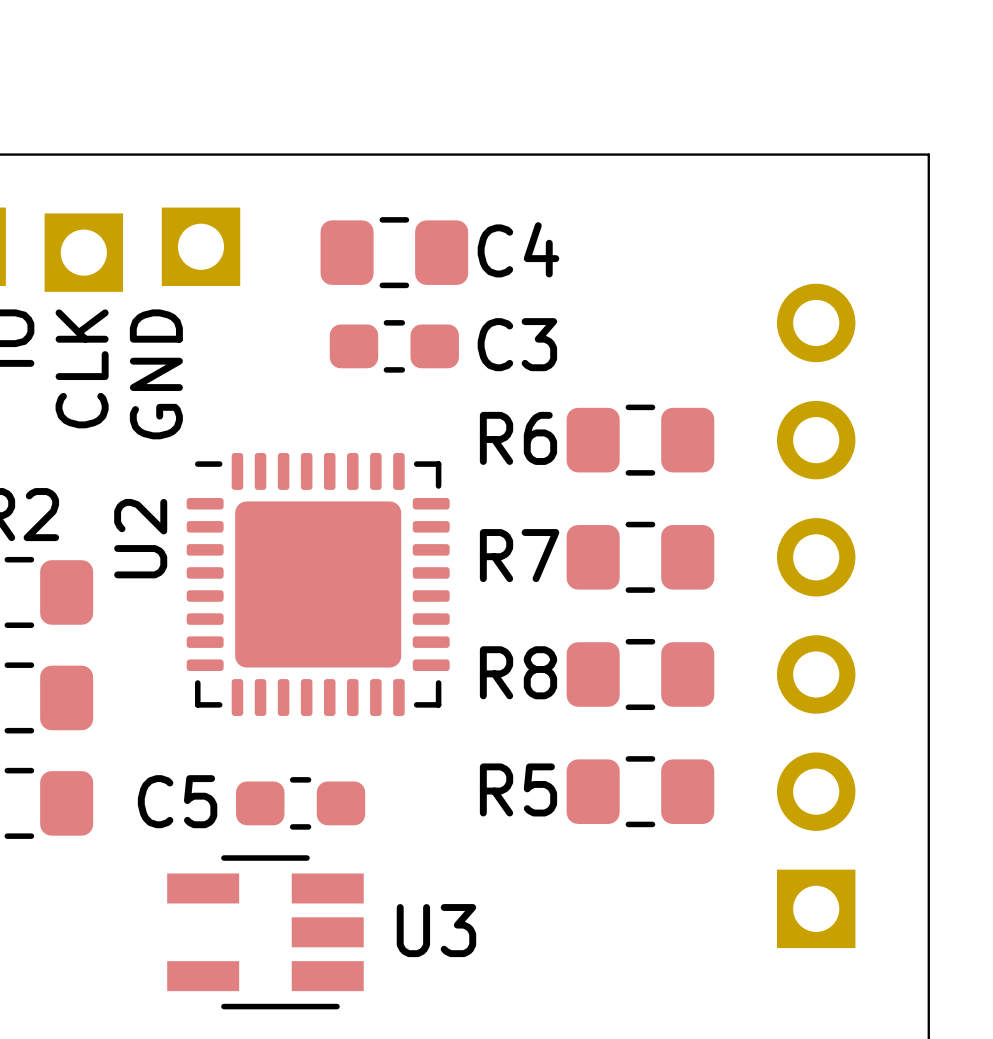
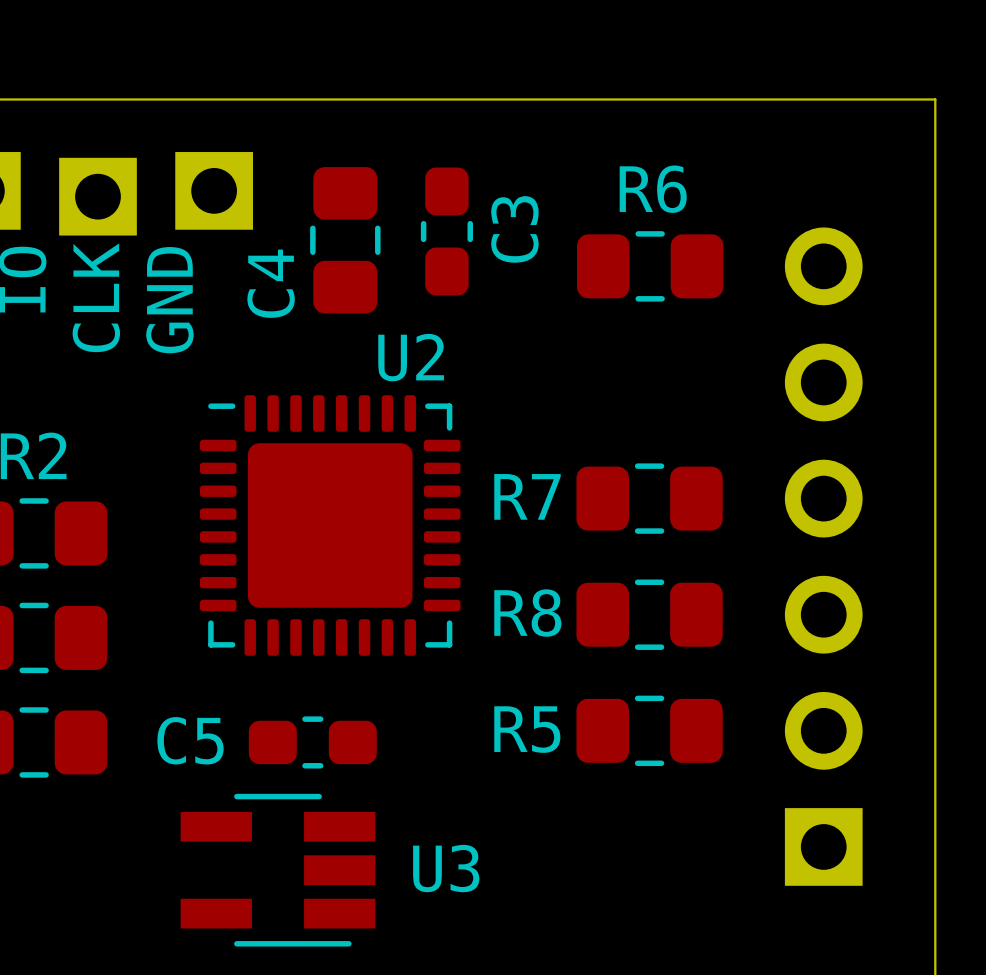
C4 name position: C4 (518, 249) -> C4 (271, 283)
C4 rotation: 0° (394, 252) -> 90° clockwise (345, 240)
C3 rotation: 0° (394, 346) -> 90° clockwise (446, 231)
R6 name position: R6 (518, 438) -> R6 (653, 189)
R6 position: (640, 440) -> (650, 266)
U2 name rotation: 0° (140, 538) -> 90° clockwise (411, 357)
U2 name position: U2 (140, 538) -> U2 (411, 357)

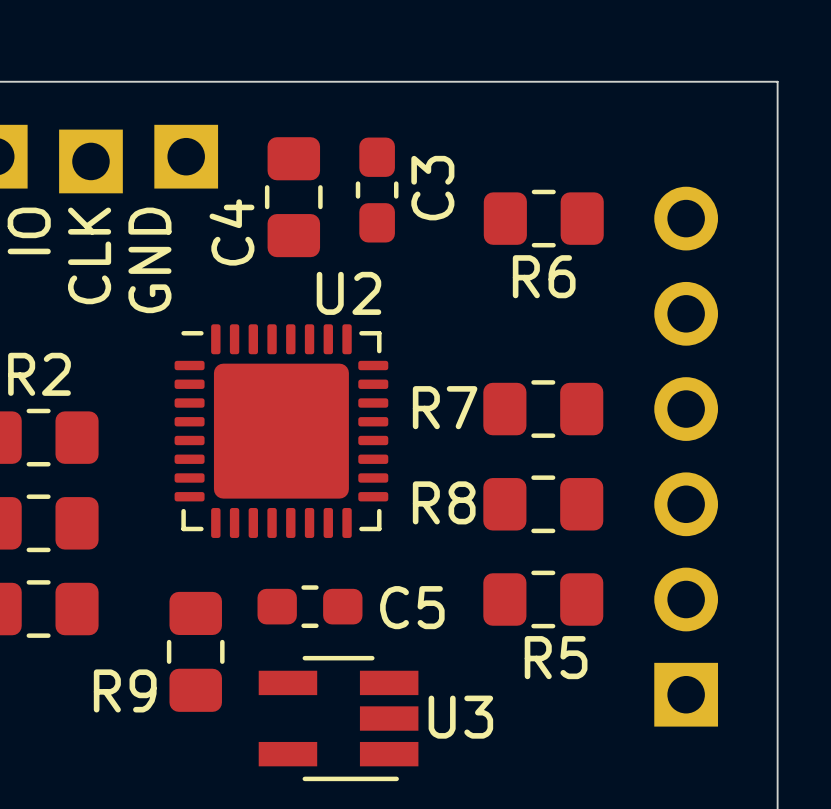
R6 name position: R6 (653, 189) -> R6 (544, 276)
R5 name position: R5 (527, 729) -> R5 (556, 657)
C5 name position: C5 (190, 740) -> C5 (412, 607)
C5 position: (312, 742) -> (310, 606)
R9: none -> (195, 651)
U3 name position: U3 (446, 868) -> U3 (460, 717)
U3 position: (277, 870) -> (338, 718)

